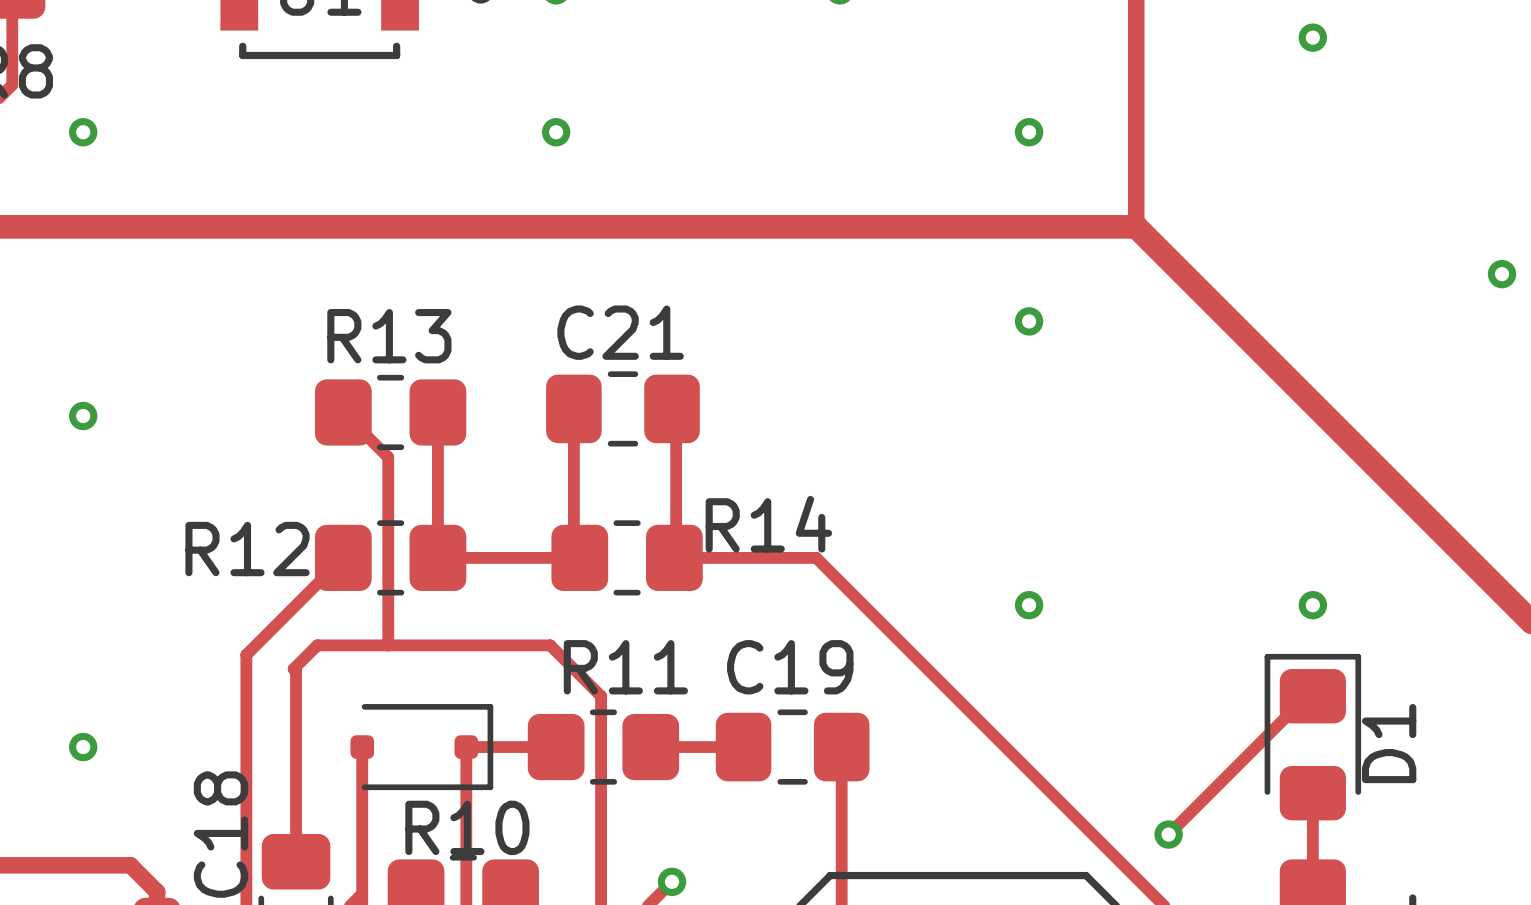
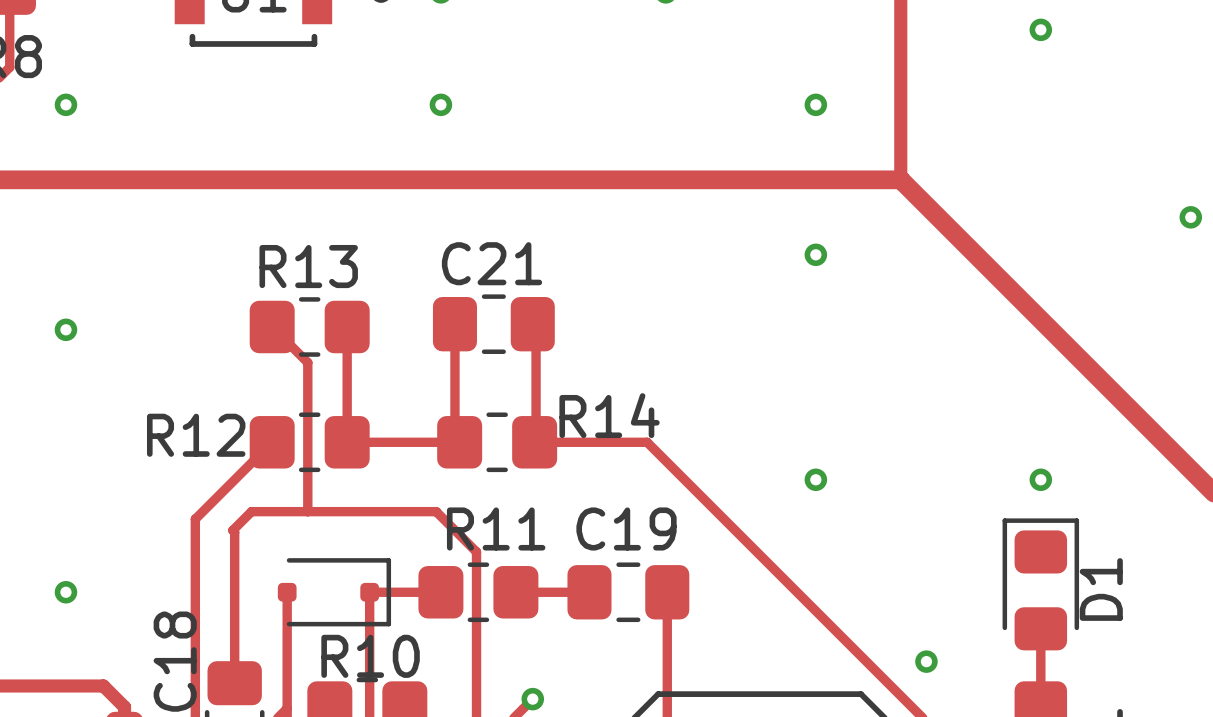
track: (1306, 696) (1168, 834) -> none

